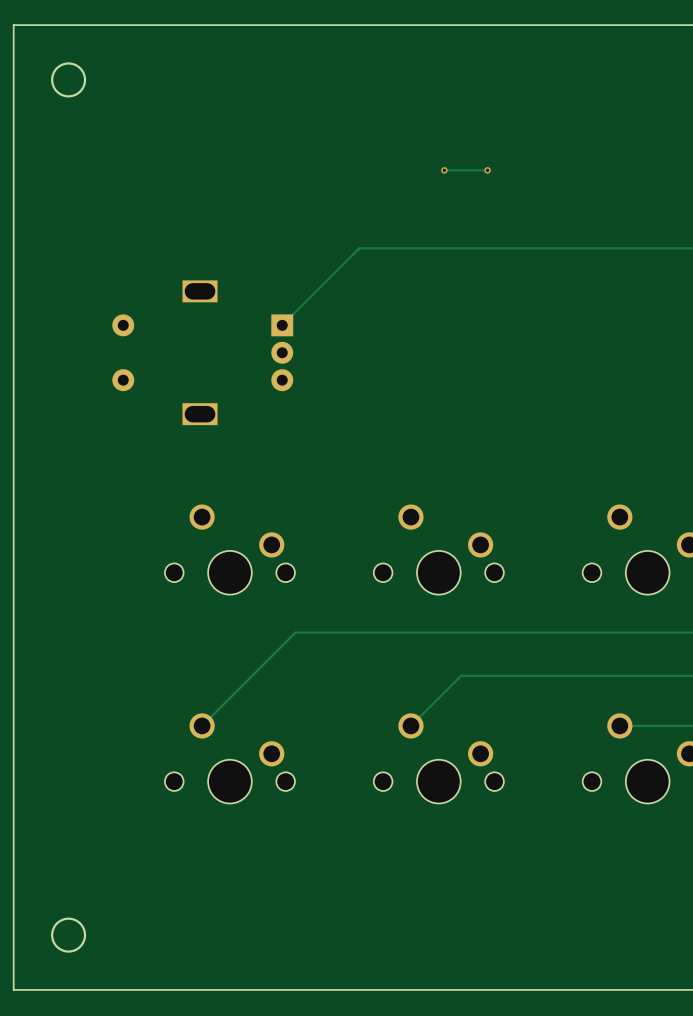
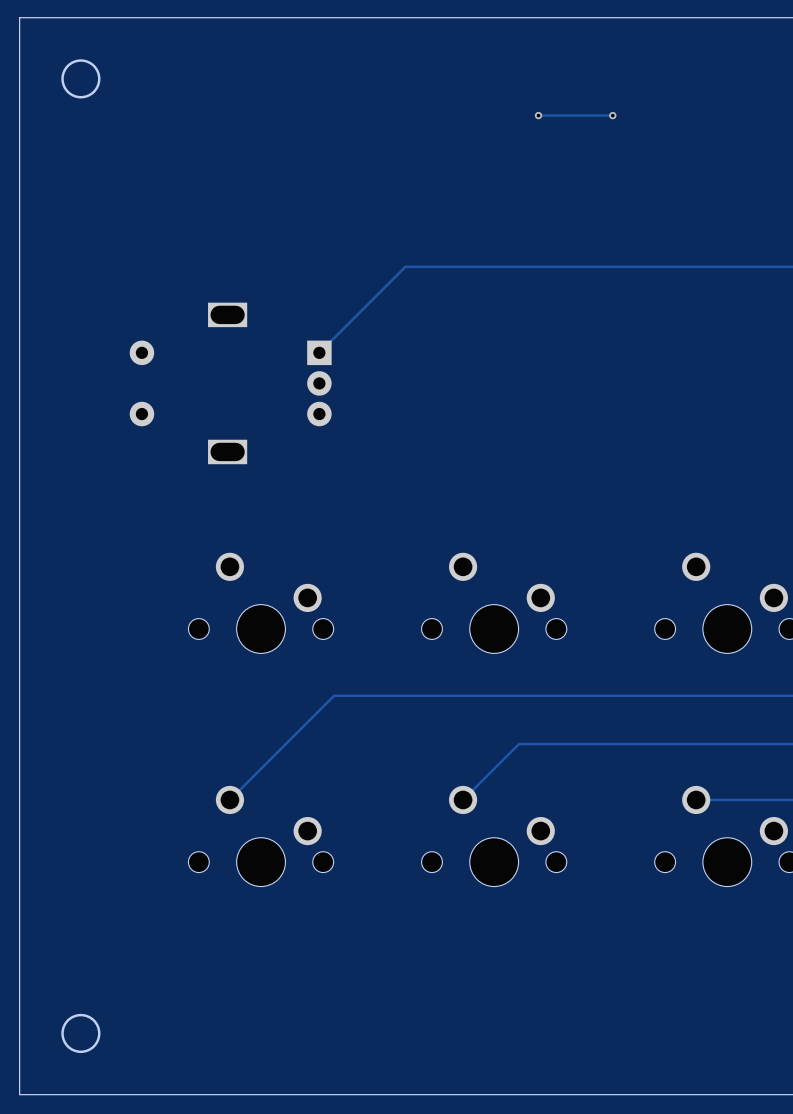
via: none -> (538, 115)
track: none -> (612, 115) (538, 115)
via: none -> (612, 115)
via: (444, 170) -> none
track: (487, 170) (444, 170) -> none
via: (487, 170) -> none

